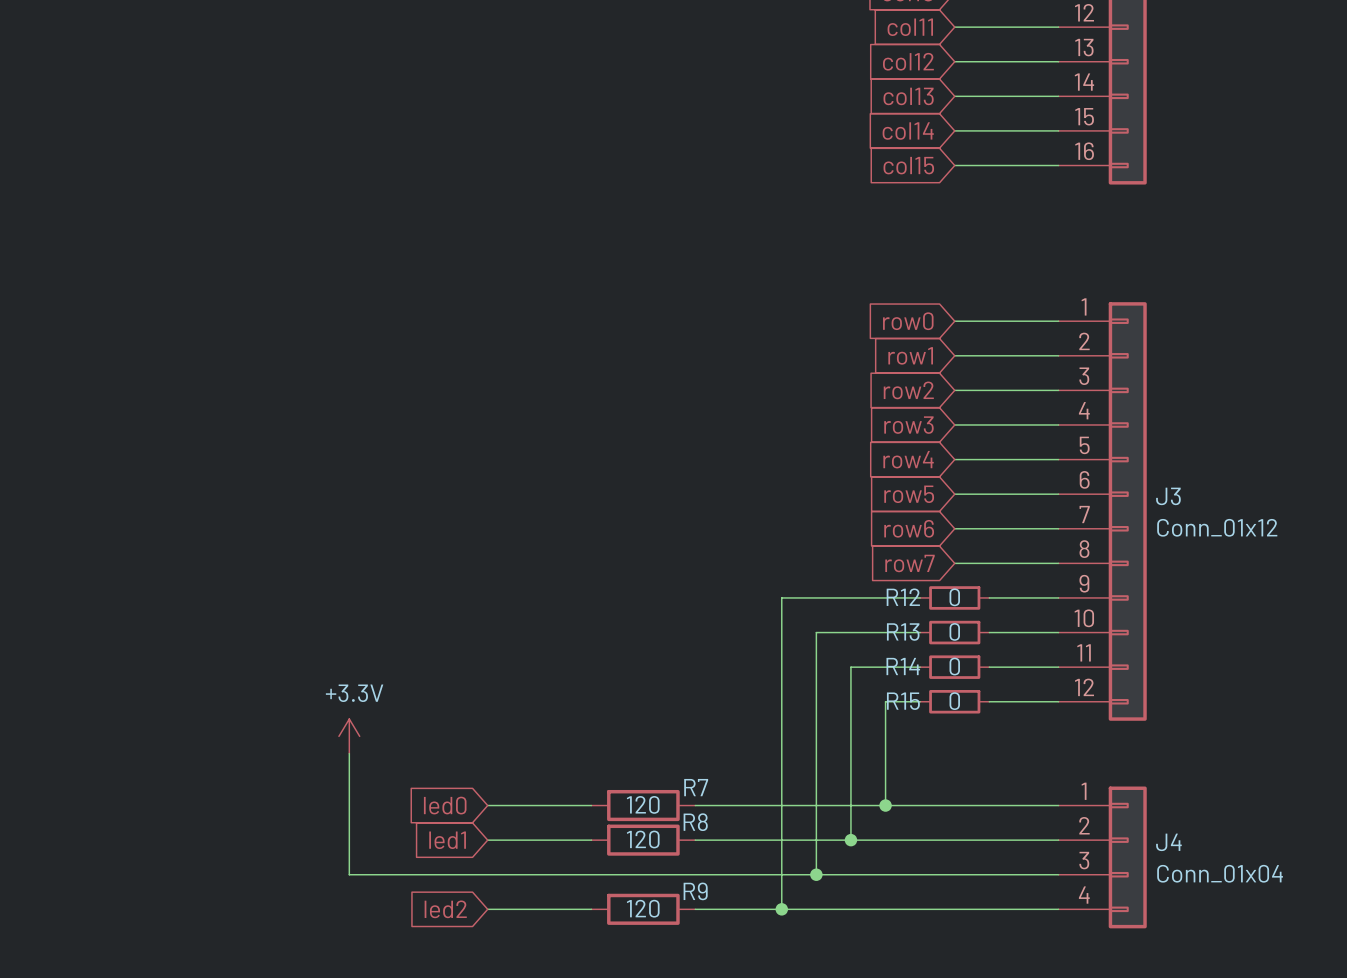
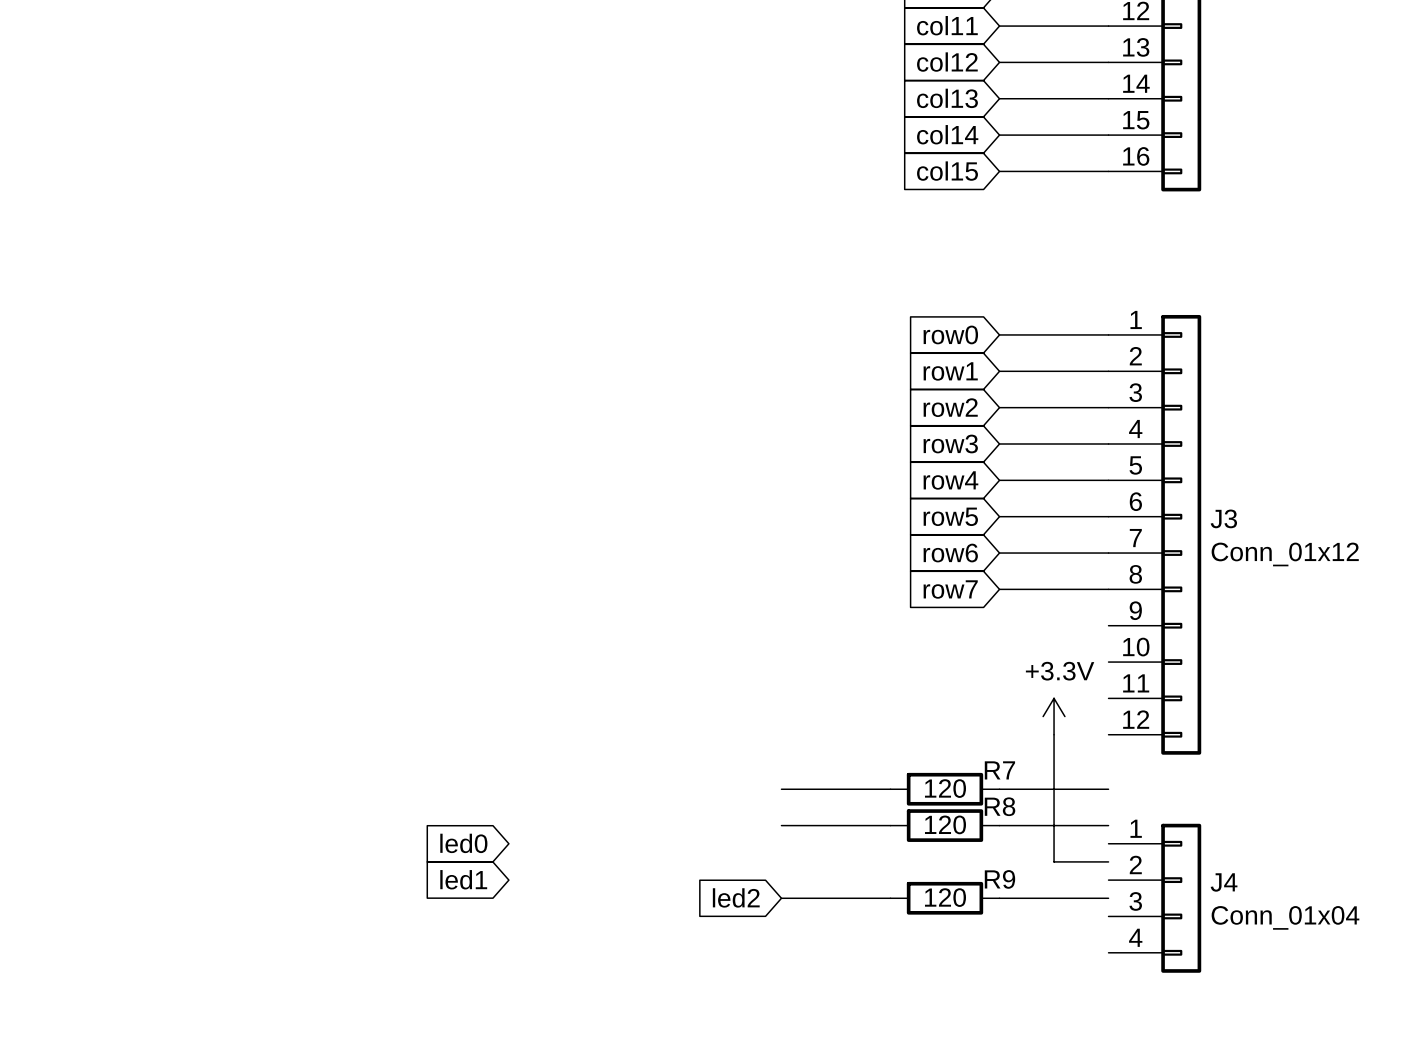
wire: (920, 597) (781, 597) (781, 909) -> none
R12: 0 (954, 597) -> none
wire: (989, 597) (1058, 597) -> none
wire: (920, 632) (816, 632) (816, 874) -> none
R13: 0 (954, 632) -> none
wire: (989, 632) (1058, 632) -> none
wire: (920, 667) (850, 667) (850, 840) -> none
R14: 0 (954, 667) -> none
wire: (989, 667) (1058, 667) -> none
power symbol: none -> +3.3V (1054, 716)
wire: (920, 701) (885, 701) (885, 805) -> none
R15: 0 (954, 701) -> none
wire: (989, 701) (1058, 701) -> none
wire: none -> (1054, 734) (1054, 861) (1108, 861)
power symbol: +3.3V (349, 736) -> none
wire: (349, 753) (349, 874) (1058, 874) -> none
wire: none -> (999, 789) (1108, 789)
wire: none -> (999, 825) (1108, 825)
wire: (487, 805) (591, 805) -> (781, 789) (890, 789)
R7 position: (643, 805) -> (945, 789)
wire: (695, 805) (1058, 805) -> none
junction: (885, 805) -> none
wire: (487, 840) (591, 840) -> (781, 825) (890, 825)
R8 position: (643, 840) -> (945, 825)
wire: (695, 840) (1058, 840) -> none
junction: (850, 840) -> none
wire: none -> (999, 898) (1108, 898)
junction: (816, 874) -> none
global label position: led2 (445, 909) -> led2 (736, 897)
wire: (487, 909) (591, 909) -> (781, 898) (890, 898)
R9 position: (643, 909) -> (945, 898)
wire: (695, 909) (1058, 909) -> none
junction: (781, 909) -> none

